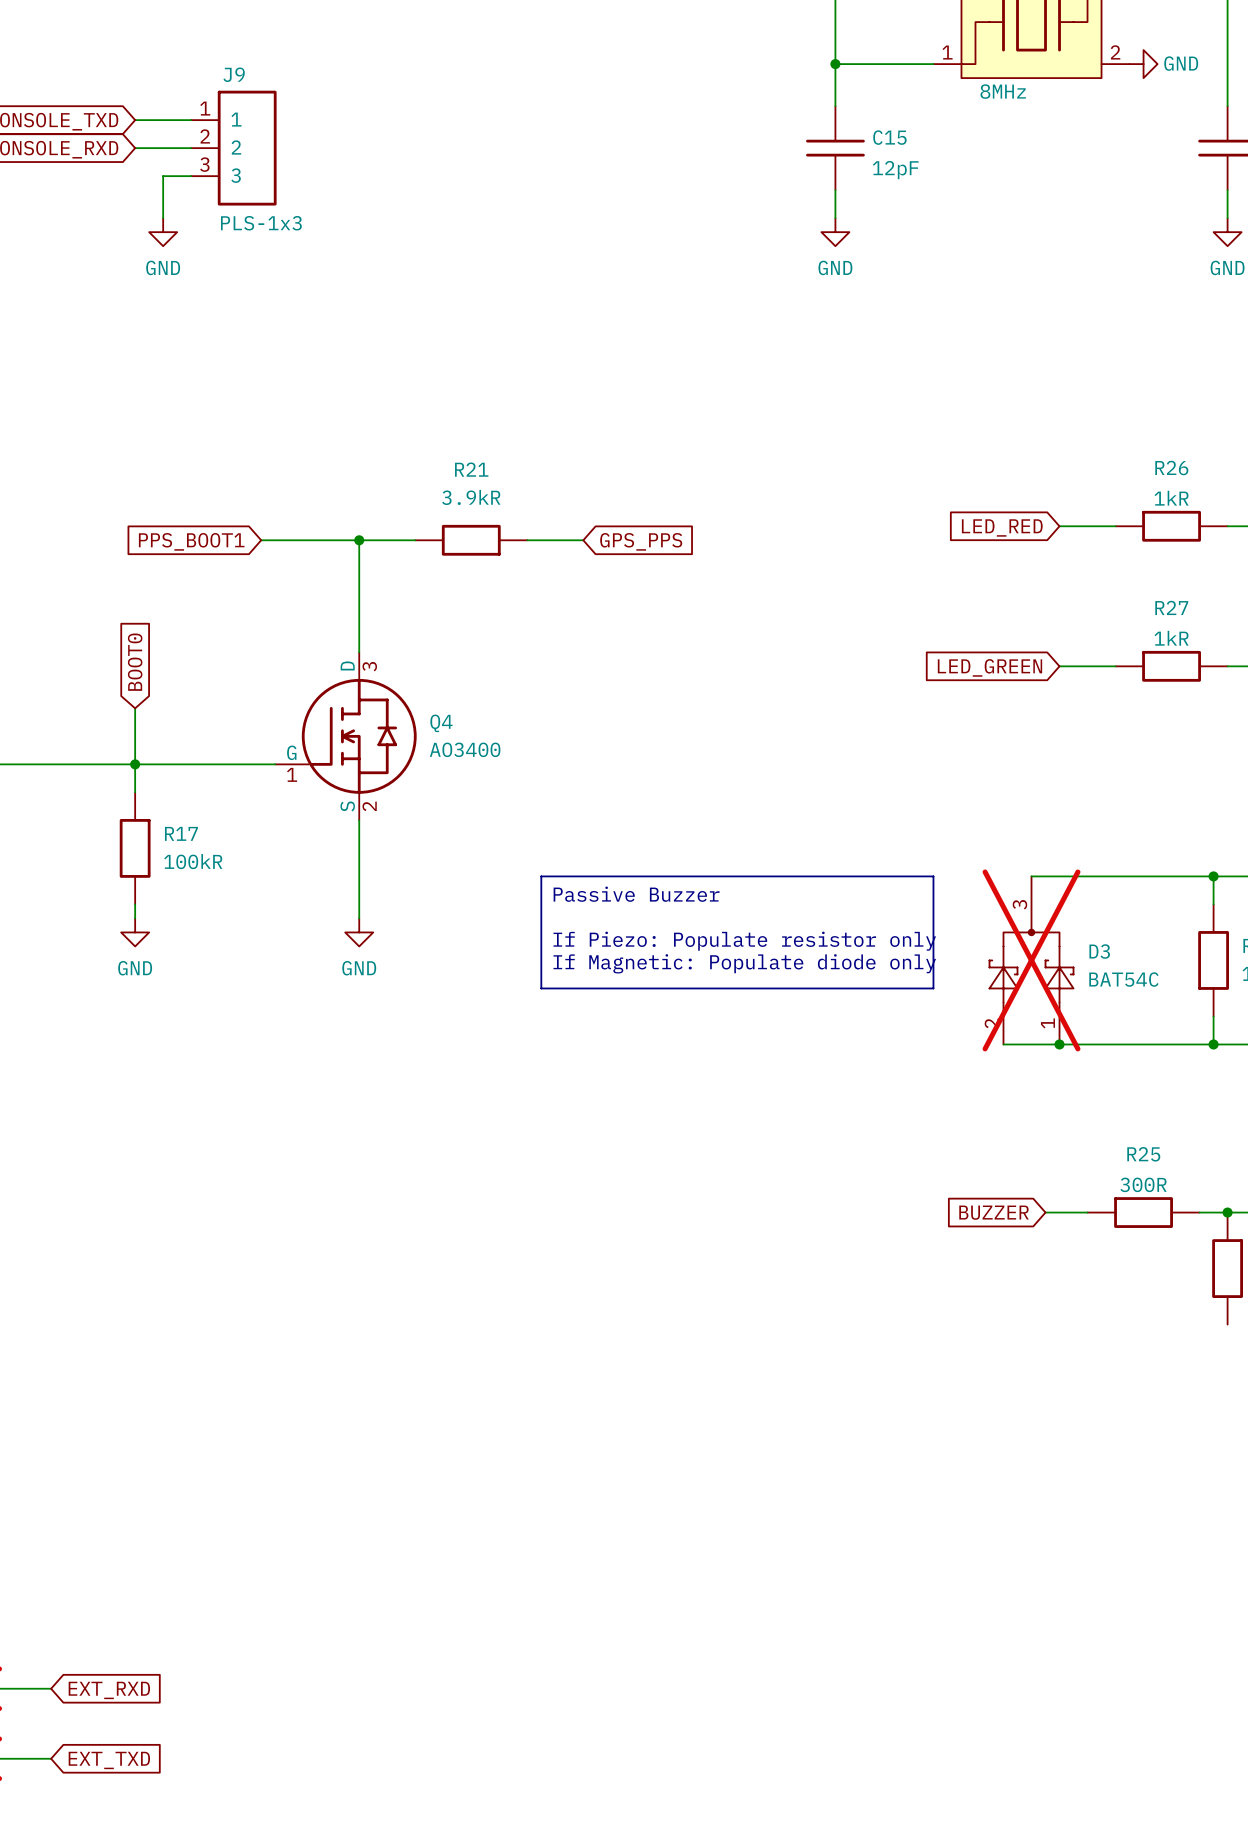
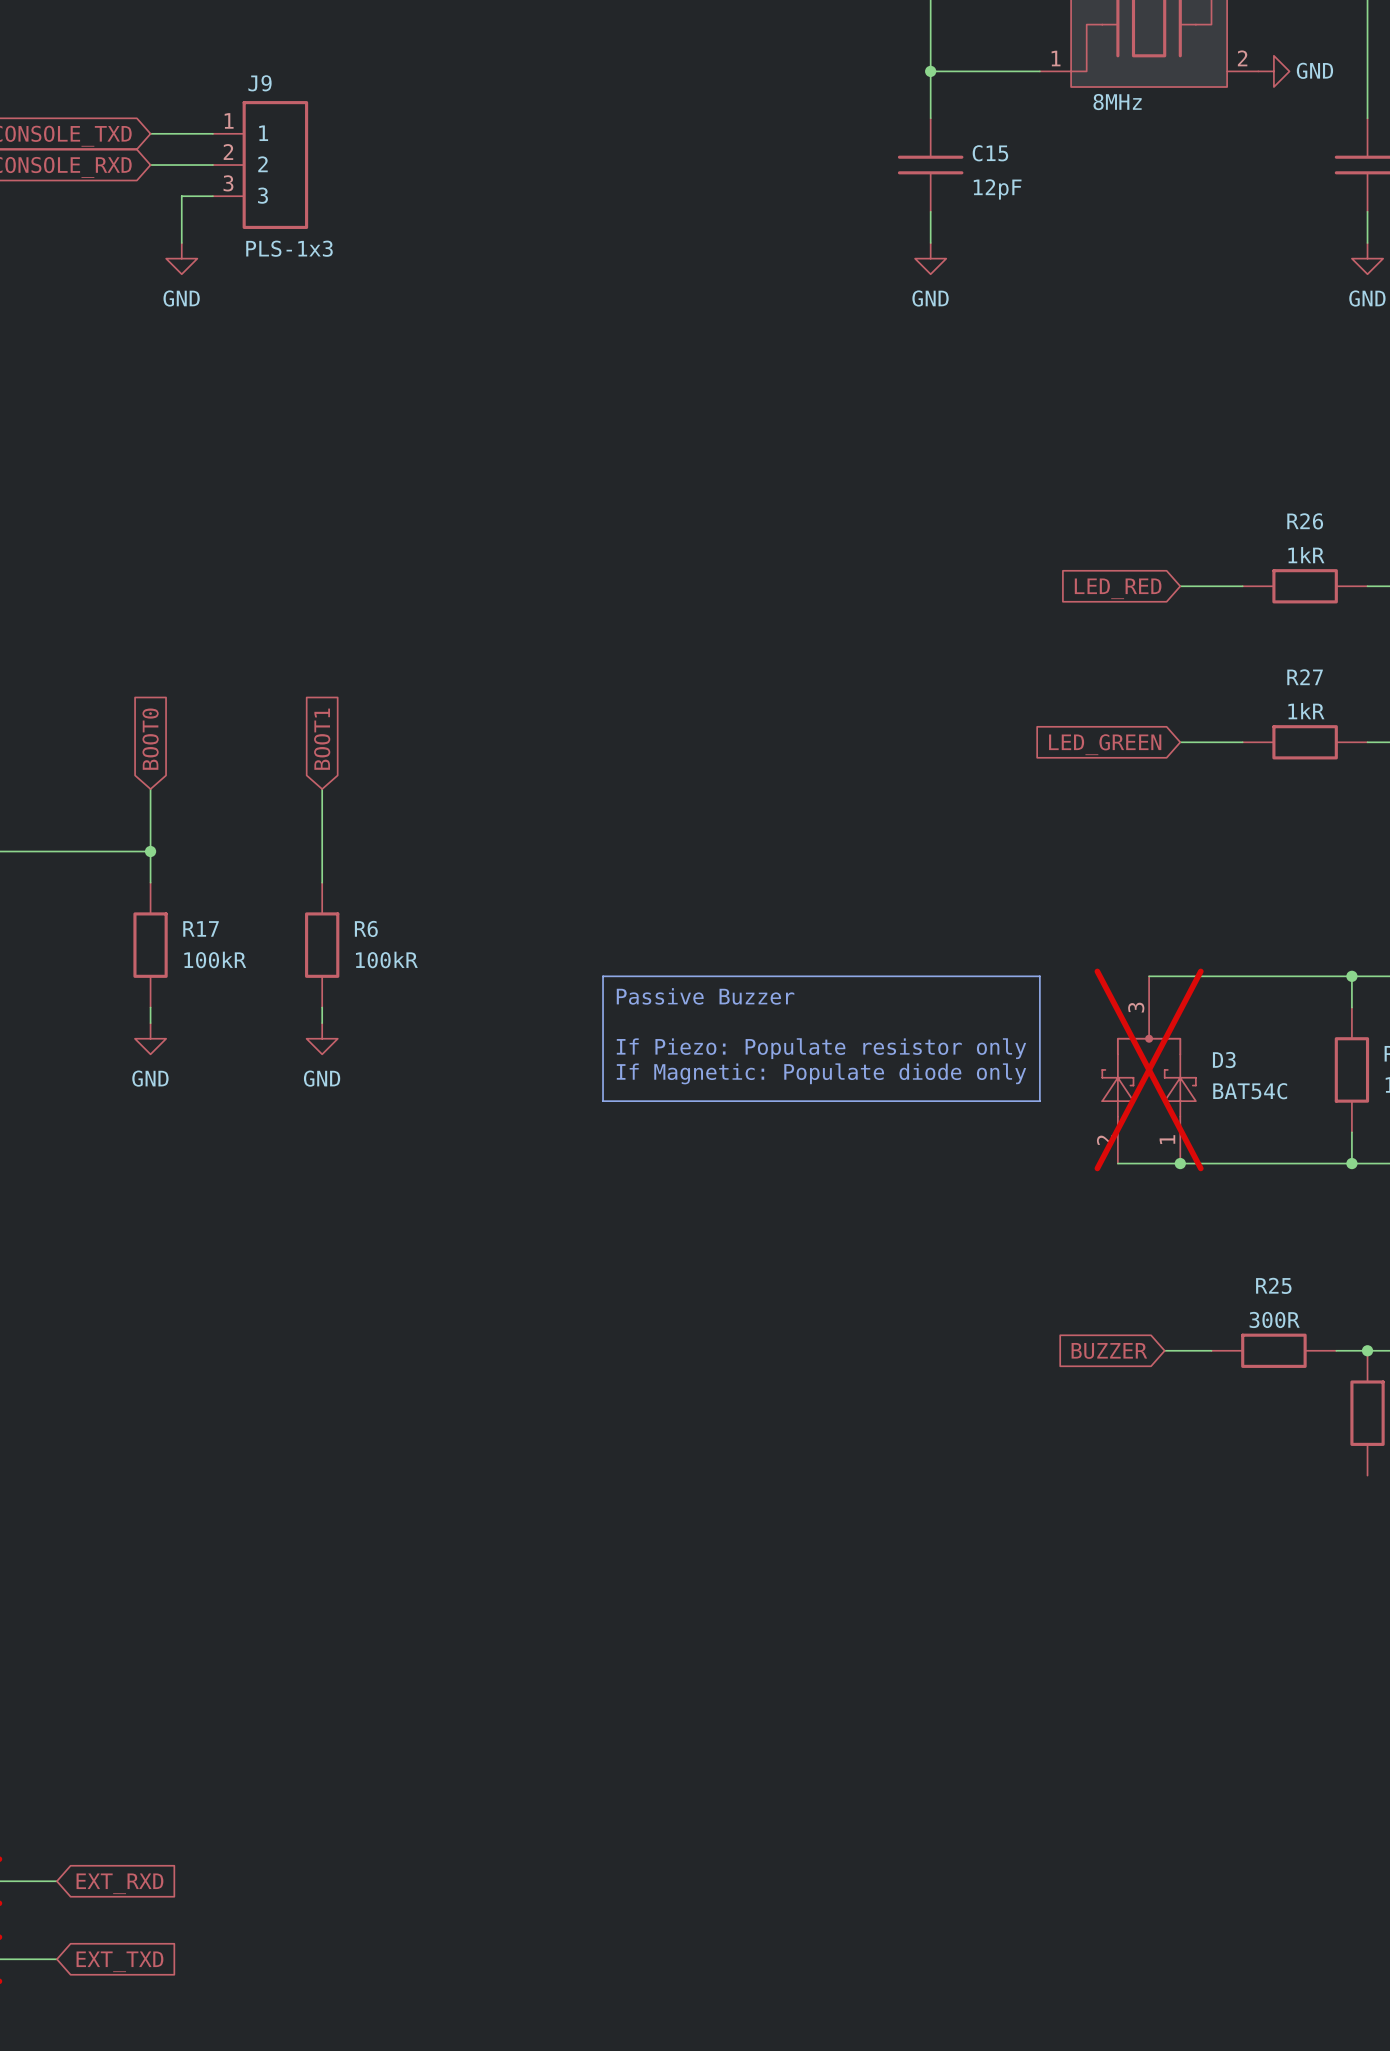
wire: (261, 540) (415, 540) -> none
wire: (359, 540) (359, 652) -> none
junction: (359, 540) -> none
R21: 3.9kR (471, 540) -> none
wire: (527, 540) (583, 540) -> none
global label: PPS_BOOT1 (191, 541) -> none
global label: GPS_PPS (641, 541) -> none
global label: none -> BOOT1 (322, 739)
wire: none -> (322, 789) (322, 882)
Q4: AO3400 (345, 736) -> none
wire: (135, 764) (275, 764) -> none
wire: (359, 820) (359, 918) -> none
R6: none -> 100kR (322, 945)
wire: none -> (322, 1007) (322, 1023)
power symbol position: GND (359, 932) -> GND (322, 1038)

